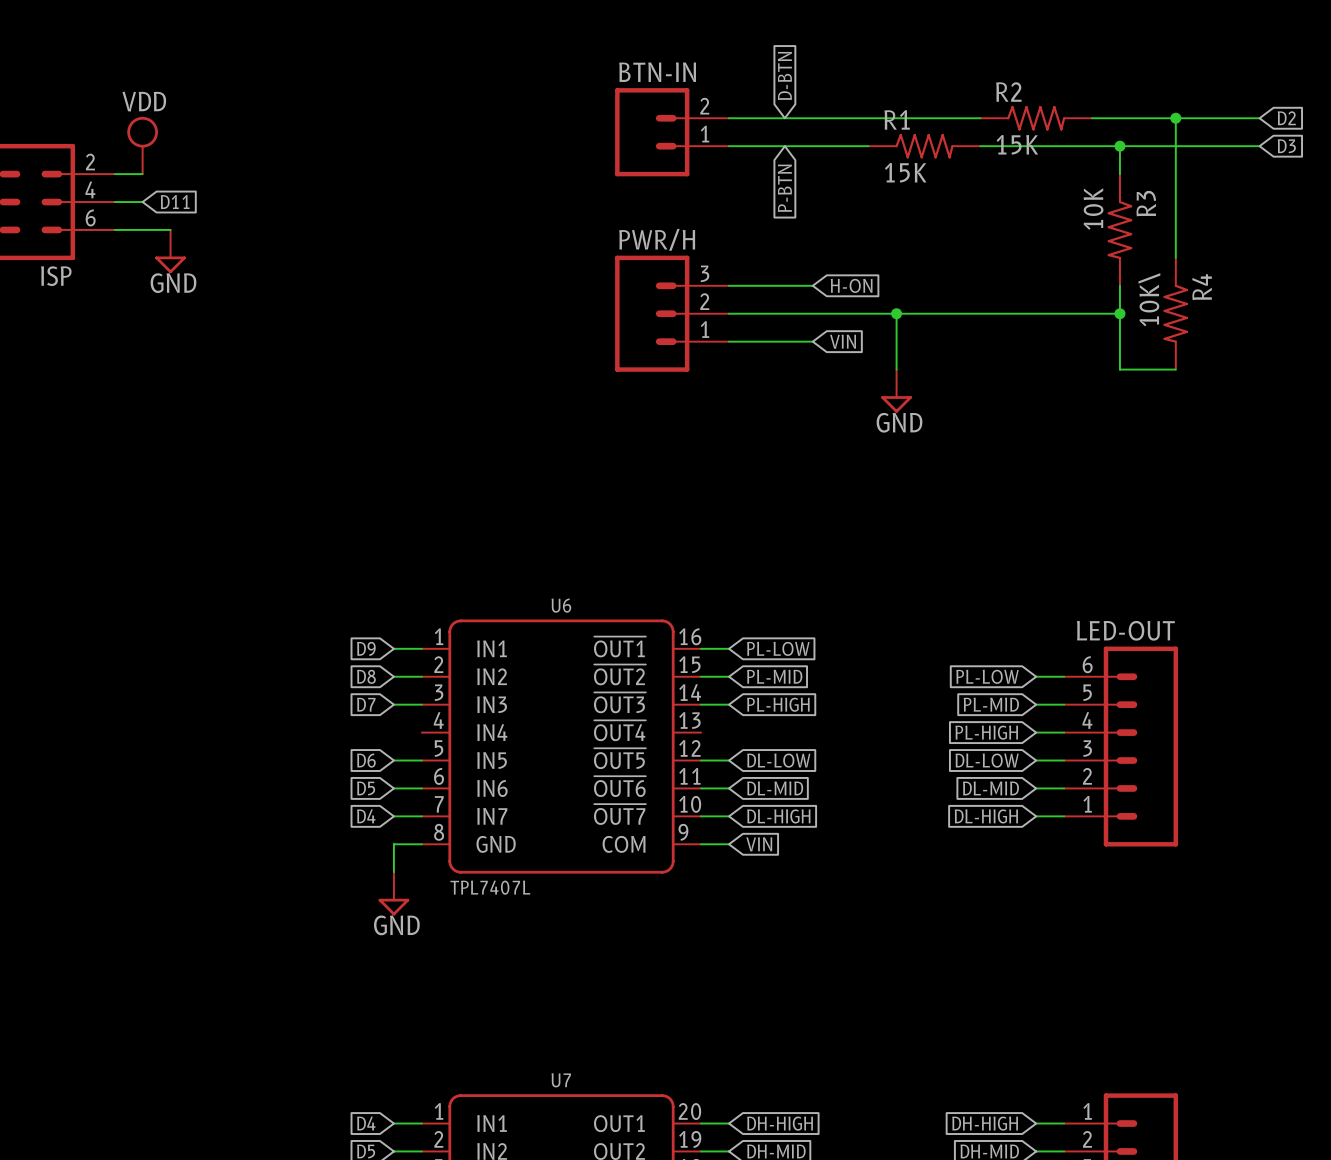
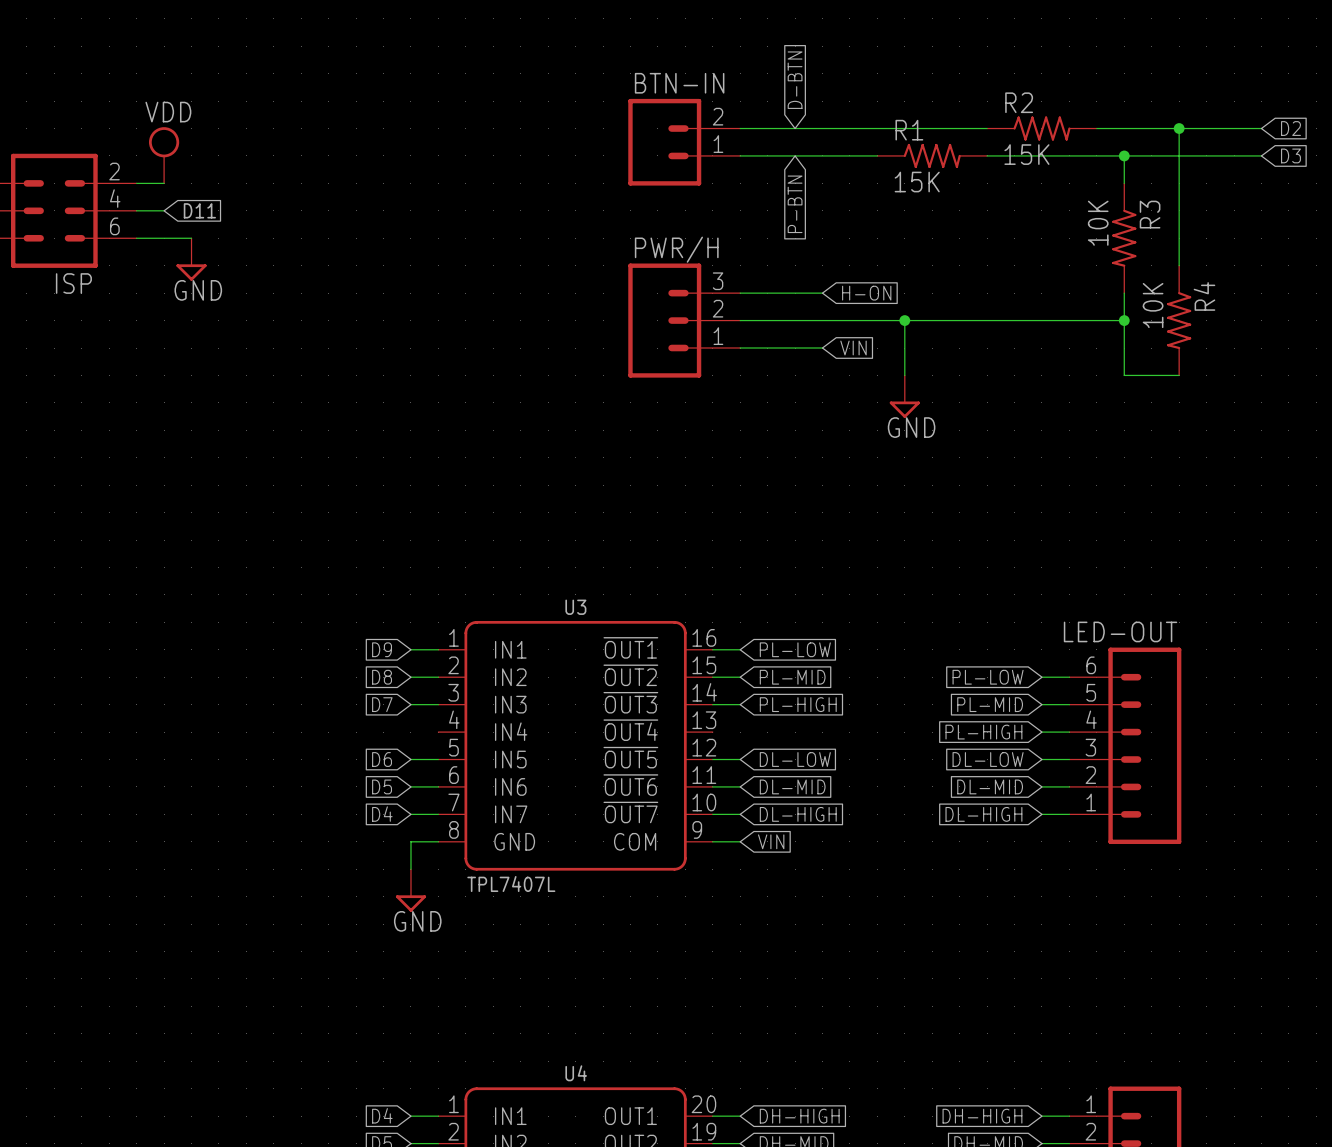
R4 value: 10K\ (1149, 299) -> 10K (1153, 305)
U6 name: U6 (561, 605) -> U3 (575, 607)
U7 name: U7 (561, 1080) -> U4 (576, 1073)

